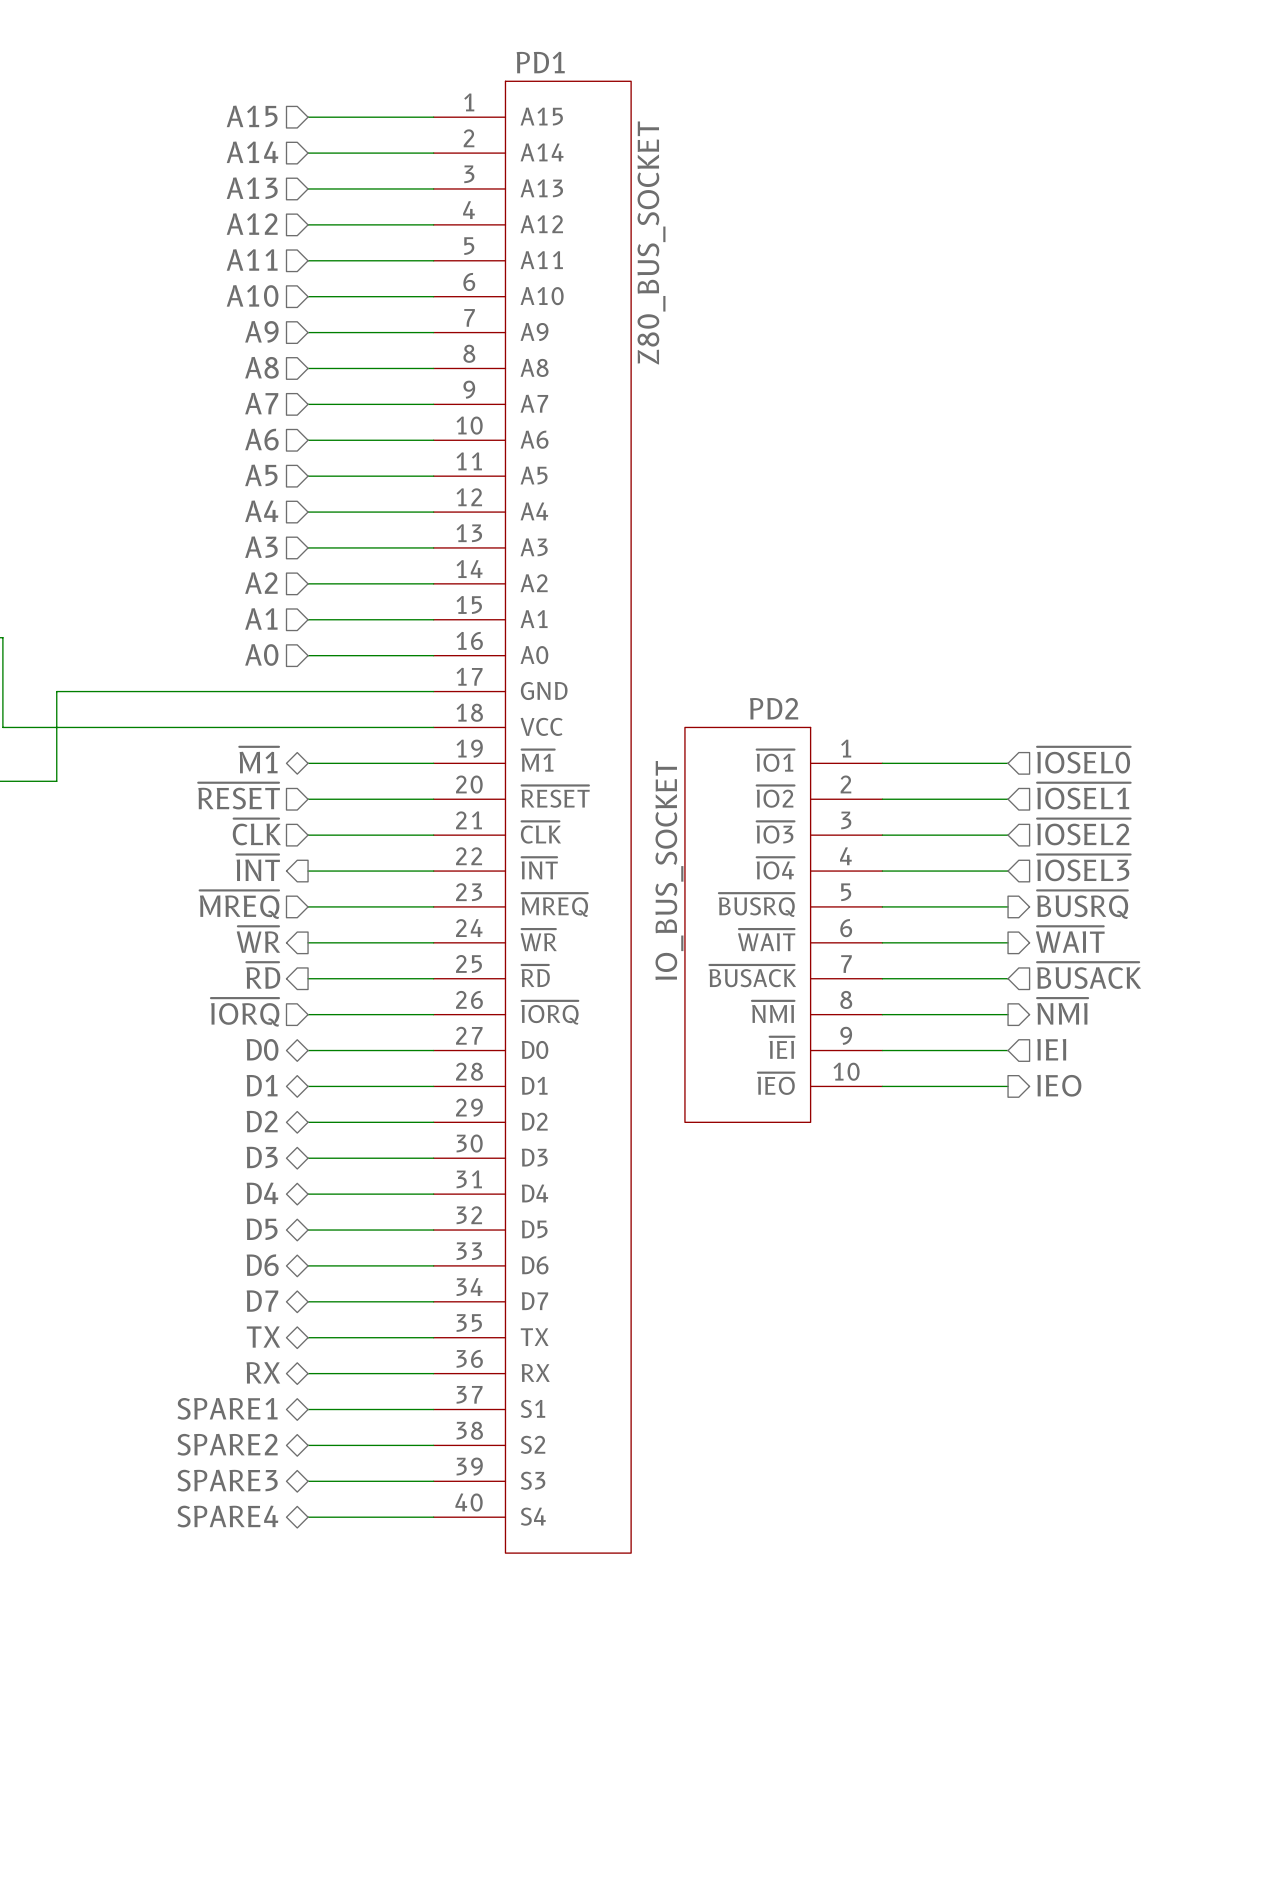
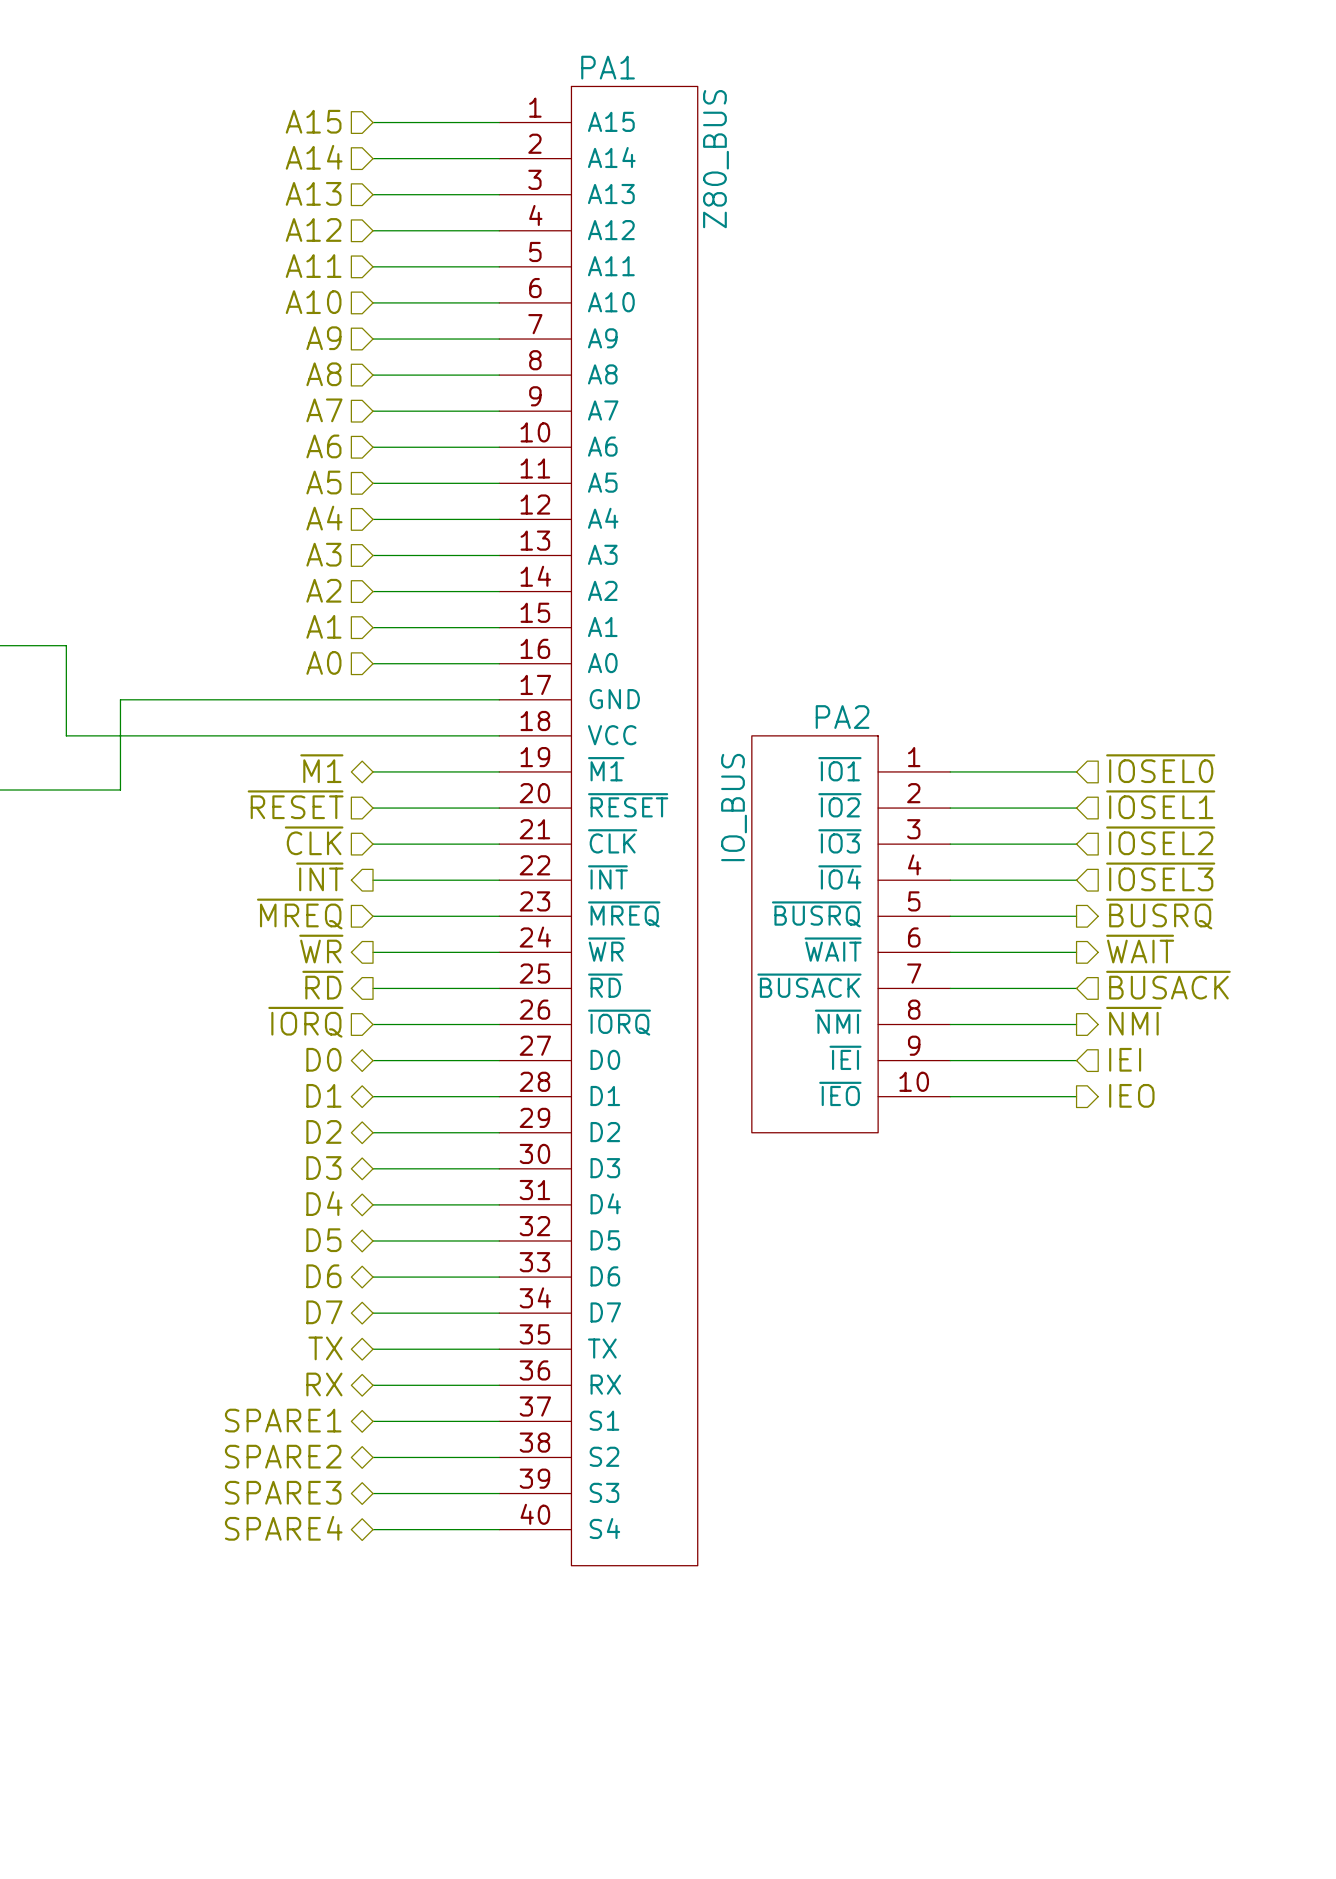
PD1 name: PD1 (540, 62) -> PA1 (608, 67)
PD1 value: Z80_BUS_SOCKET (651, 243) -> Z80_BUS (715, 159)
PD2 name: PD2 (774, 708) -> PA2 (842, 717)
PD2 value: IO_BUS_SOCKET (669, 870) -> IO_BUS (734, 807)

